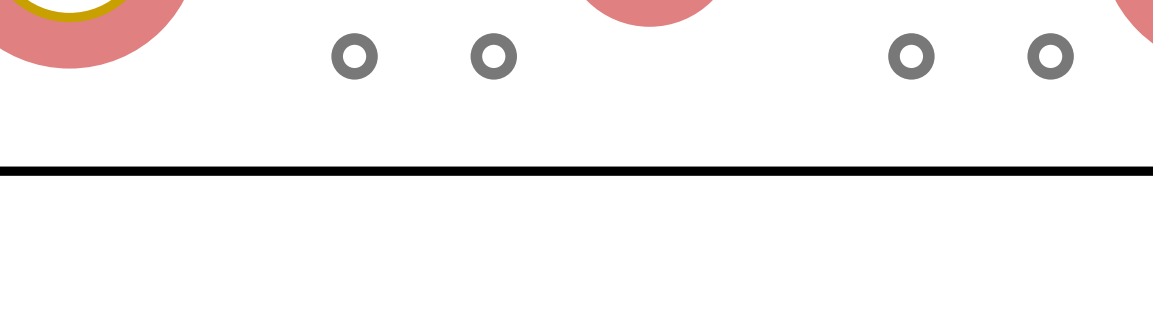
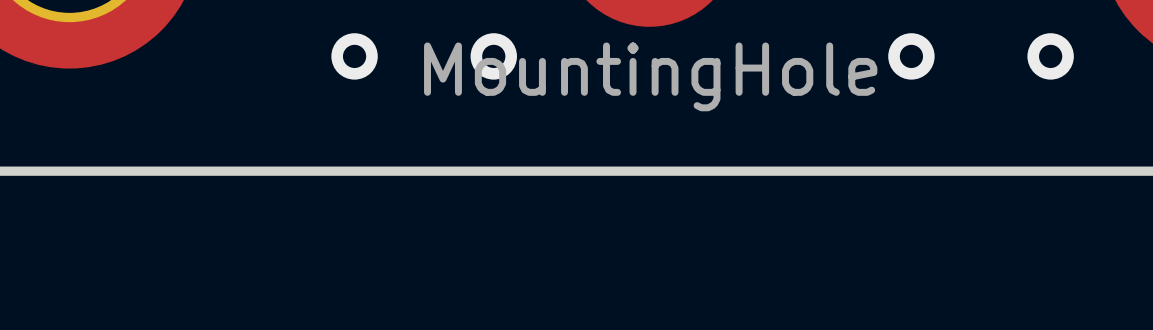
part value: none -> MountingHole (650, 76)

